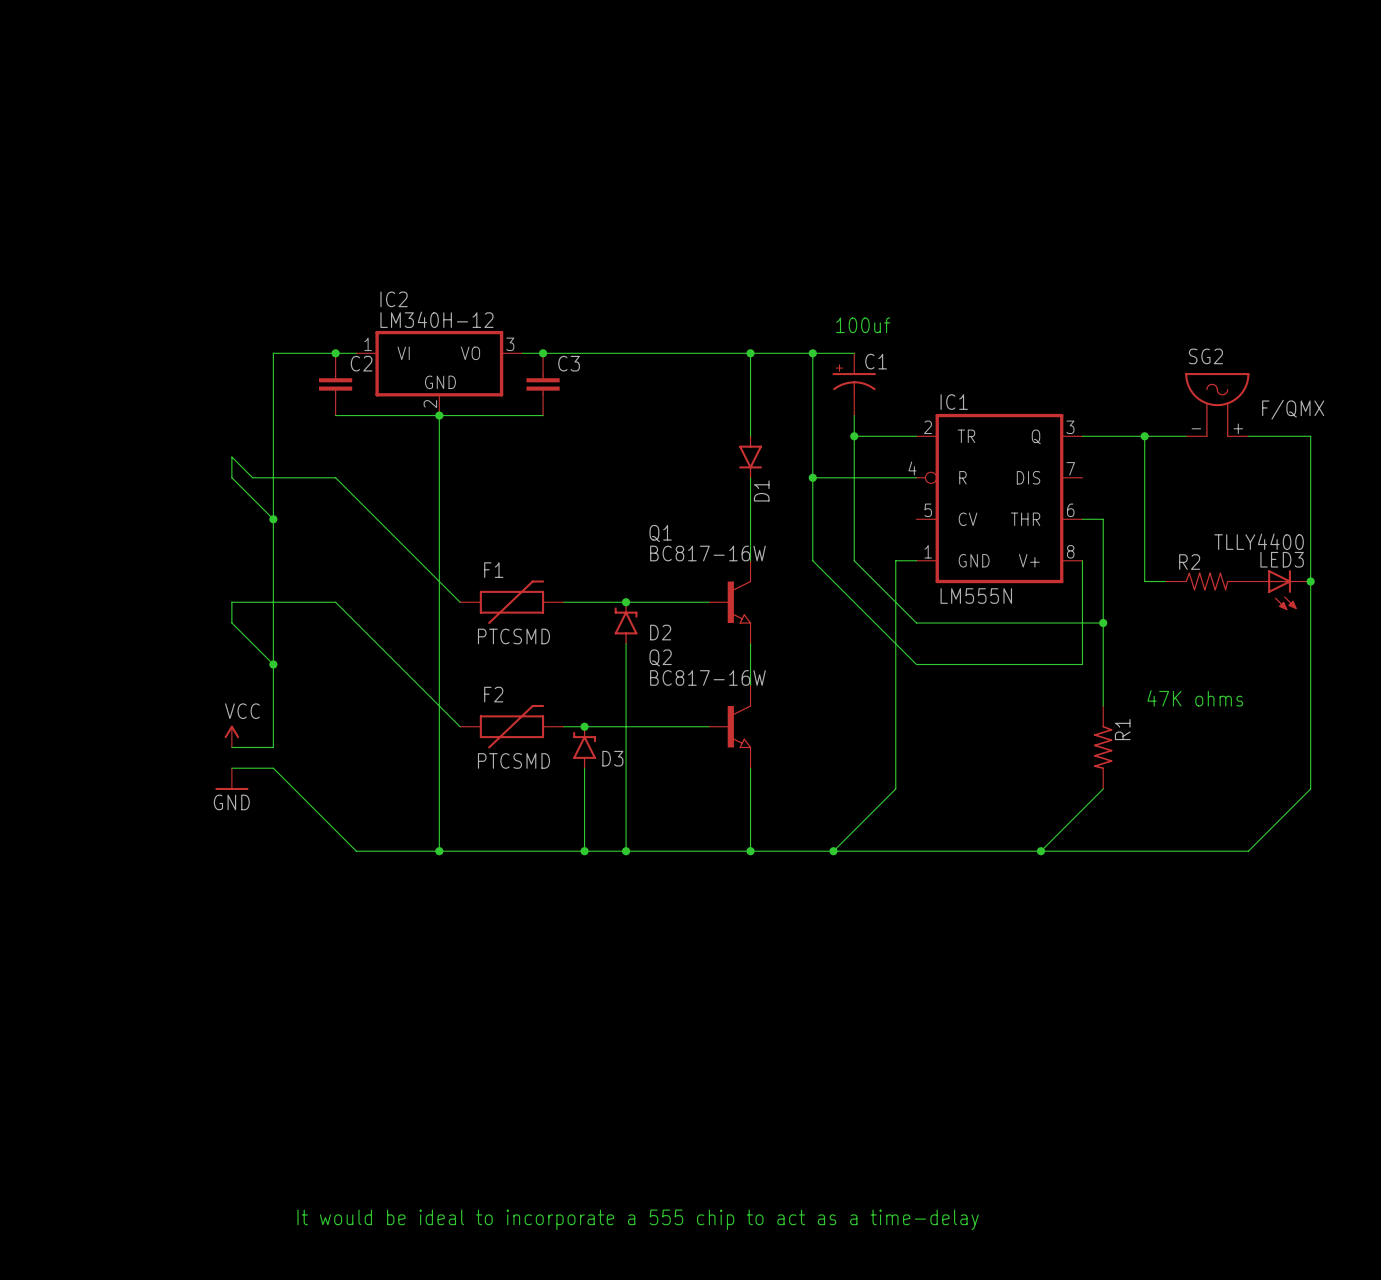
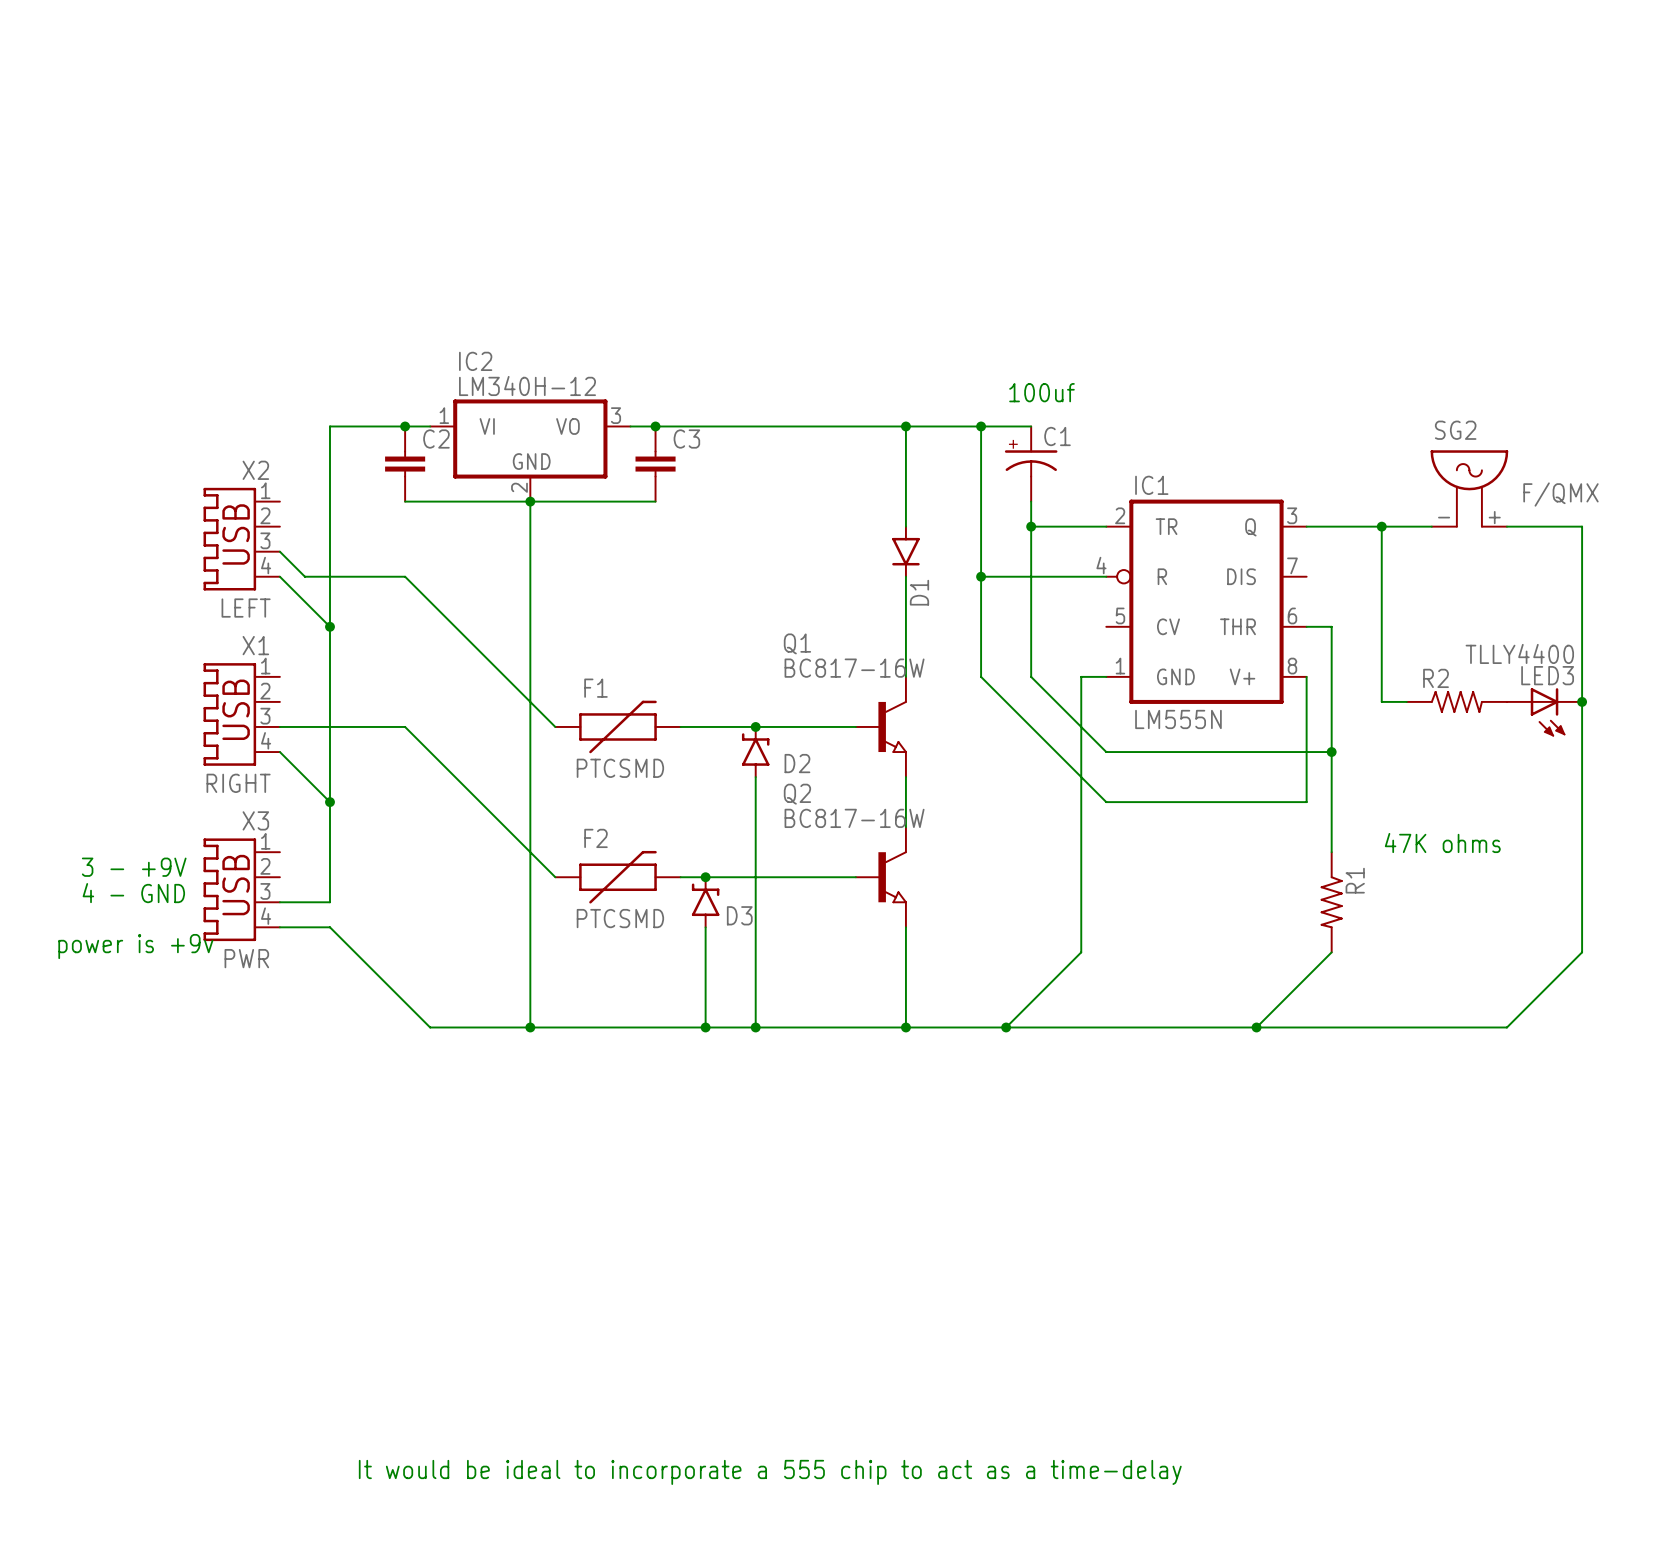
X2: none -> LEFT (241, 539)
wire: (231, 457) (231, 477) -> none
X1: none -> RIGHT (241, 714)
wire: (231, 602) (231, 623) -> none
text: none -> 3 - +9V (134, 867)
power symbol: VCC (231, 736) -> none
X3: none -> PWR (241, 889)
text: none -> 4 - GND (133, 893)
power symbol: GND (231, 779) -> none
text: none -> power is +9v (135, 946)

